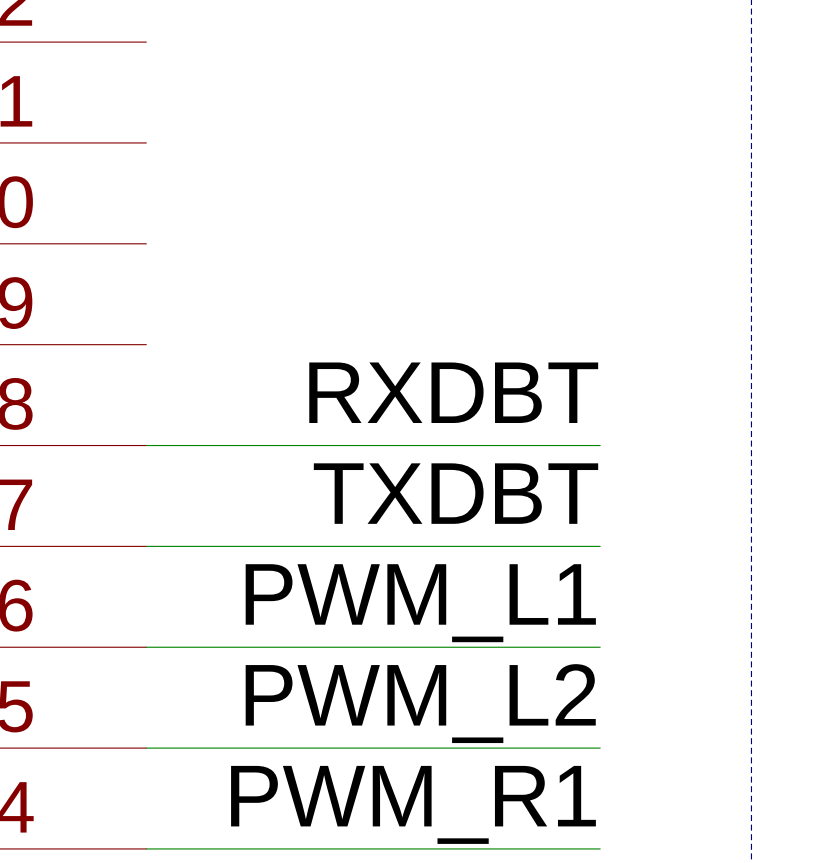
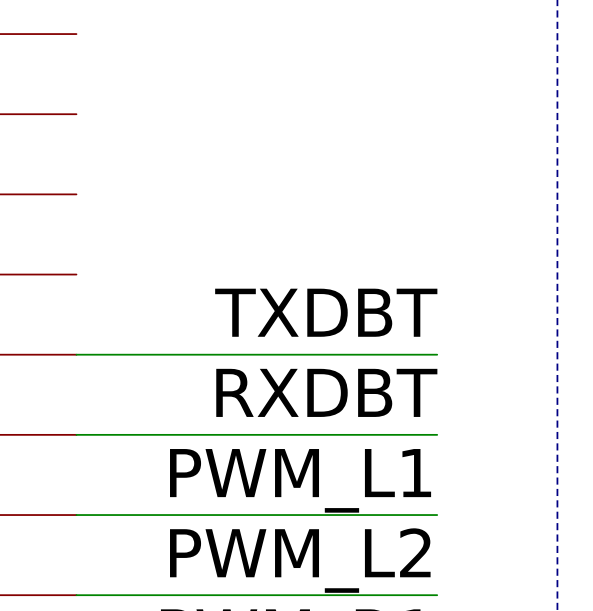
label: RXDBT (453, 392) -> TXDBT (326, 312)
label: TXDBT (456, 493) -> RXDBT (326, 392)

